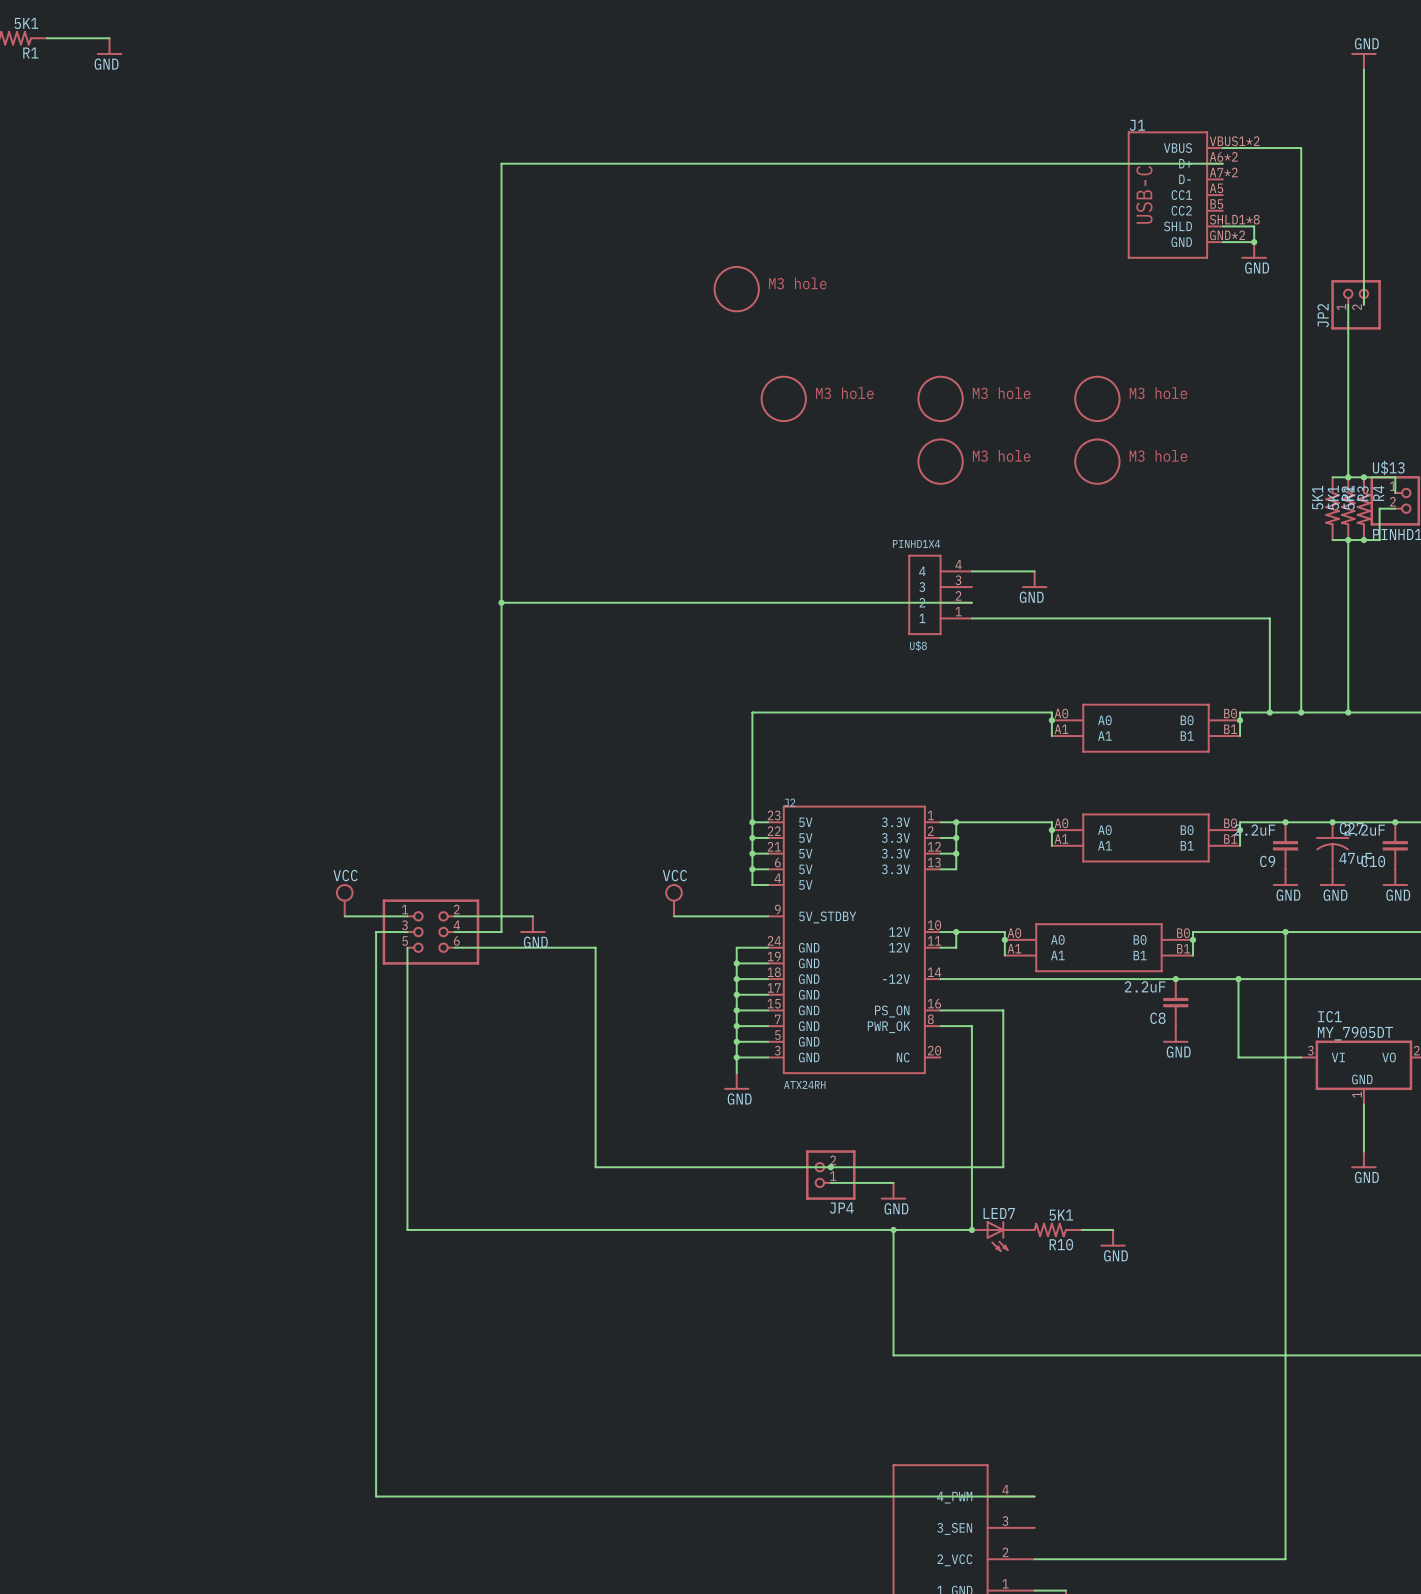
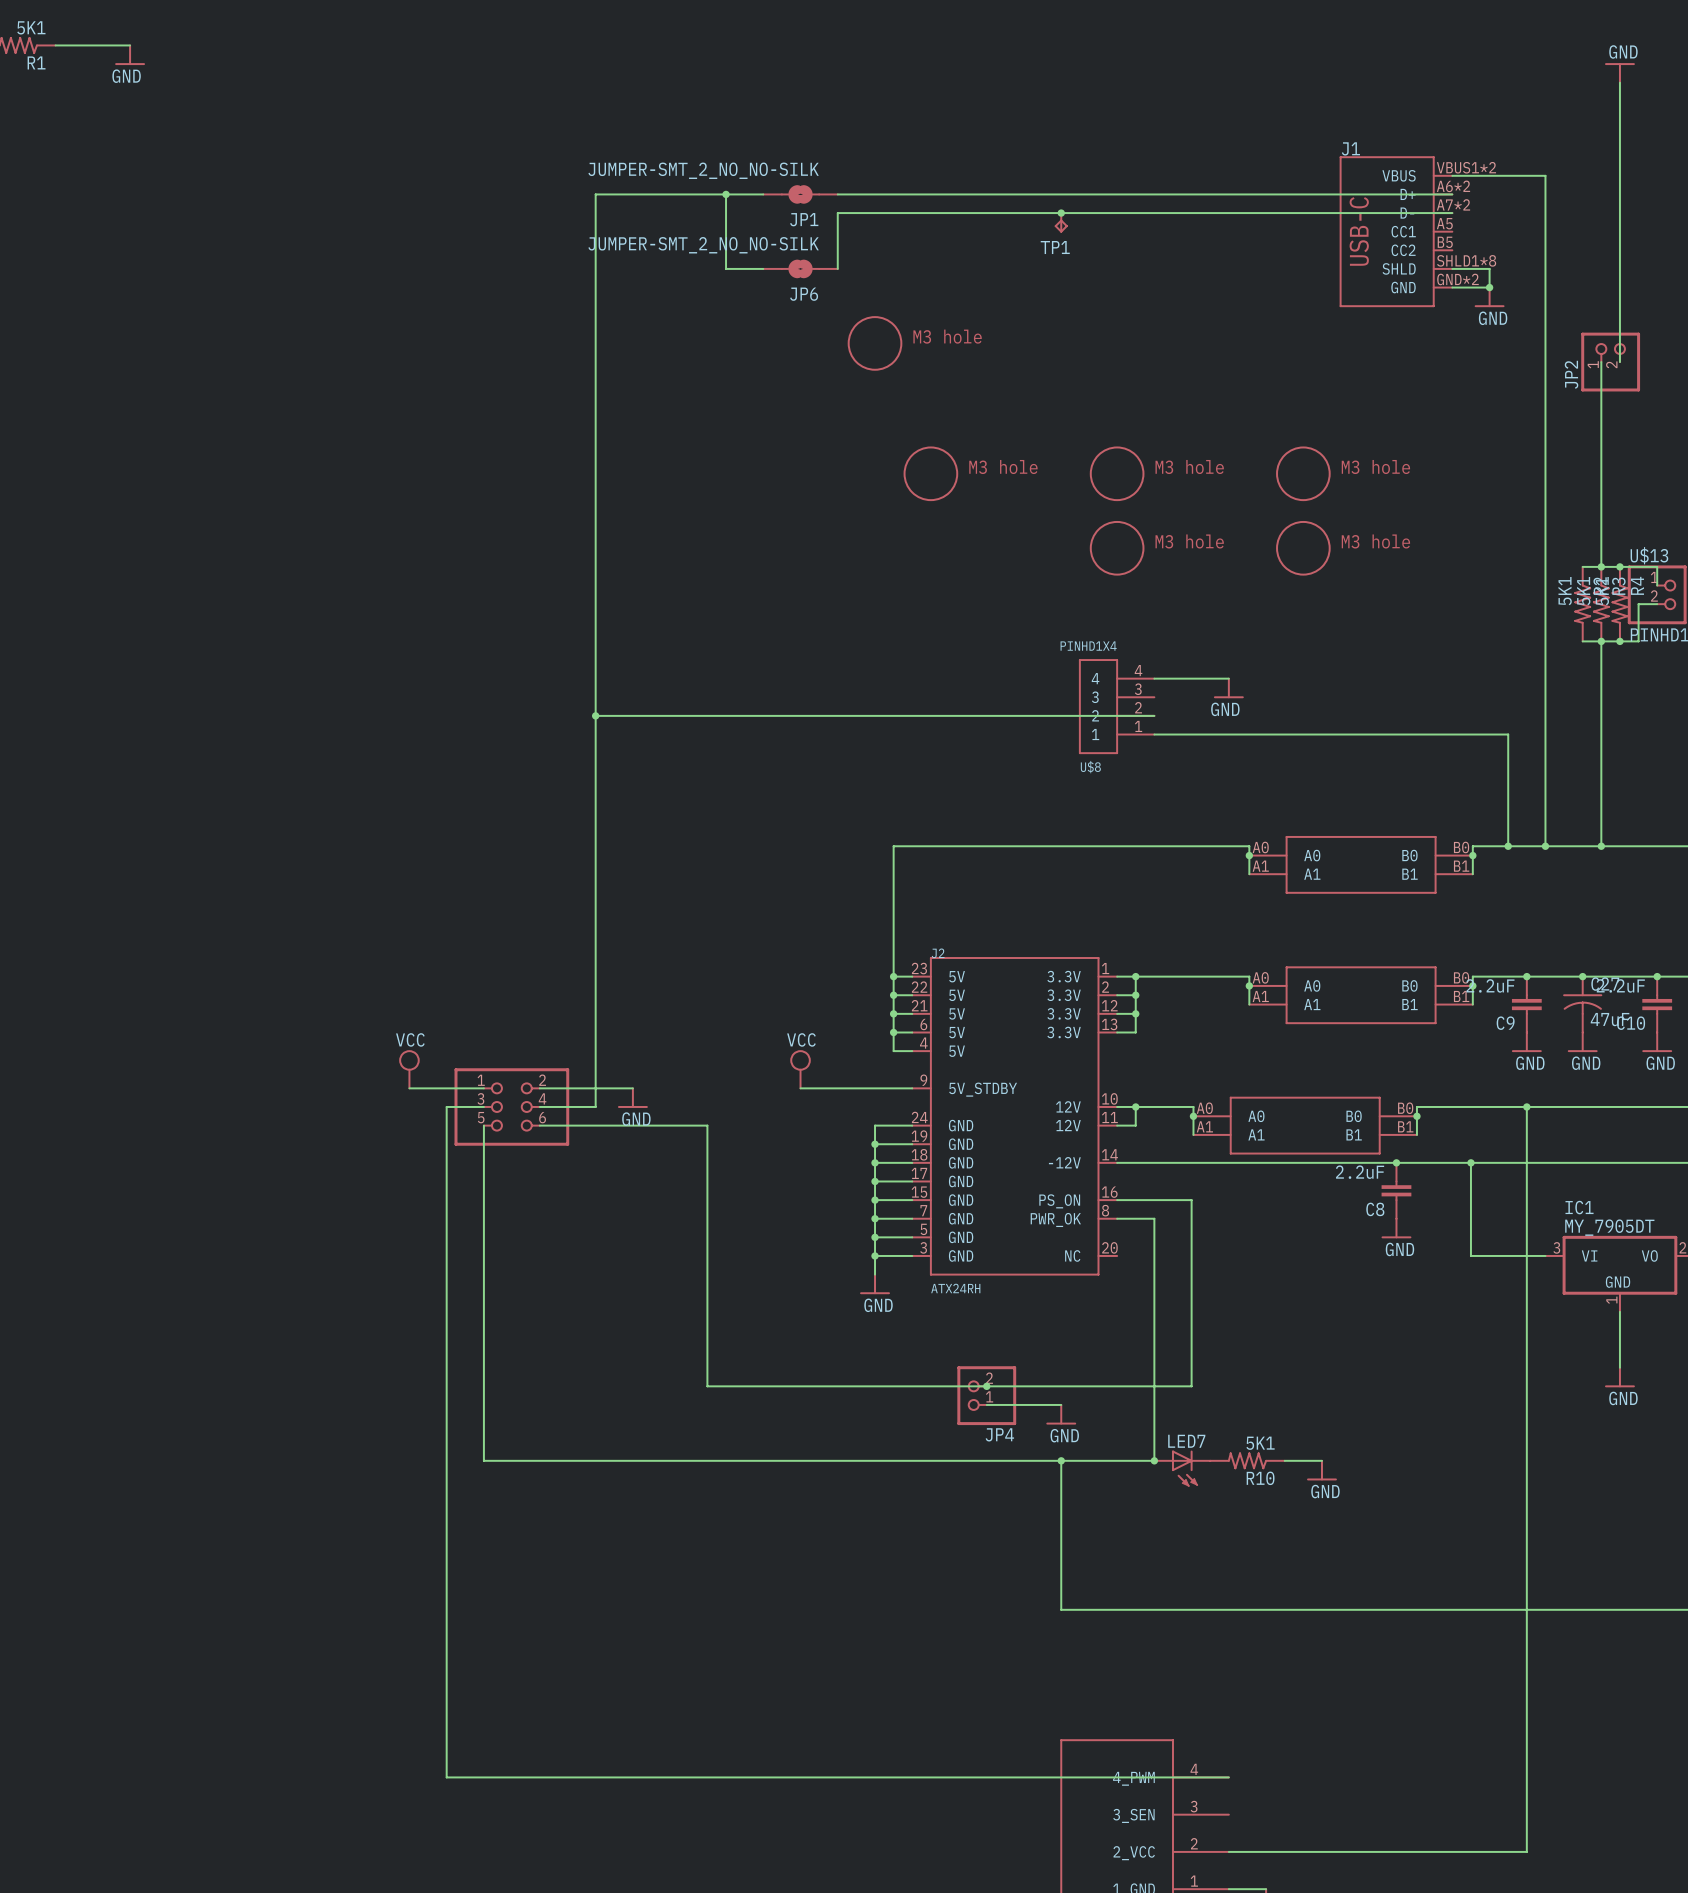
wire: none -> (726, 194) (726, 268) (763, 268)
junction: none -> (726, 194)
JP1: none -> JUMPER-SMT_2_NO_NO-SILK (800, 194)
junction: none -> (1061, 213)
wire: none -> (1452, 213) (837, 213) (837, 268)
TP1: none -> (1061, 222)
JP6: none -> JUMPER-SMT_2_NO_NO-SILK (800, 268)

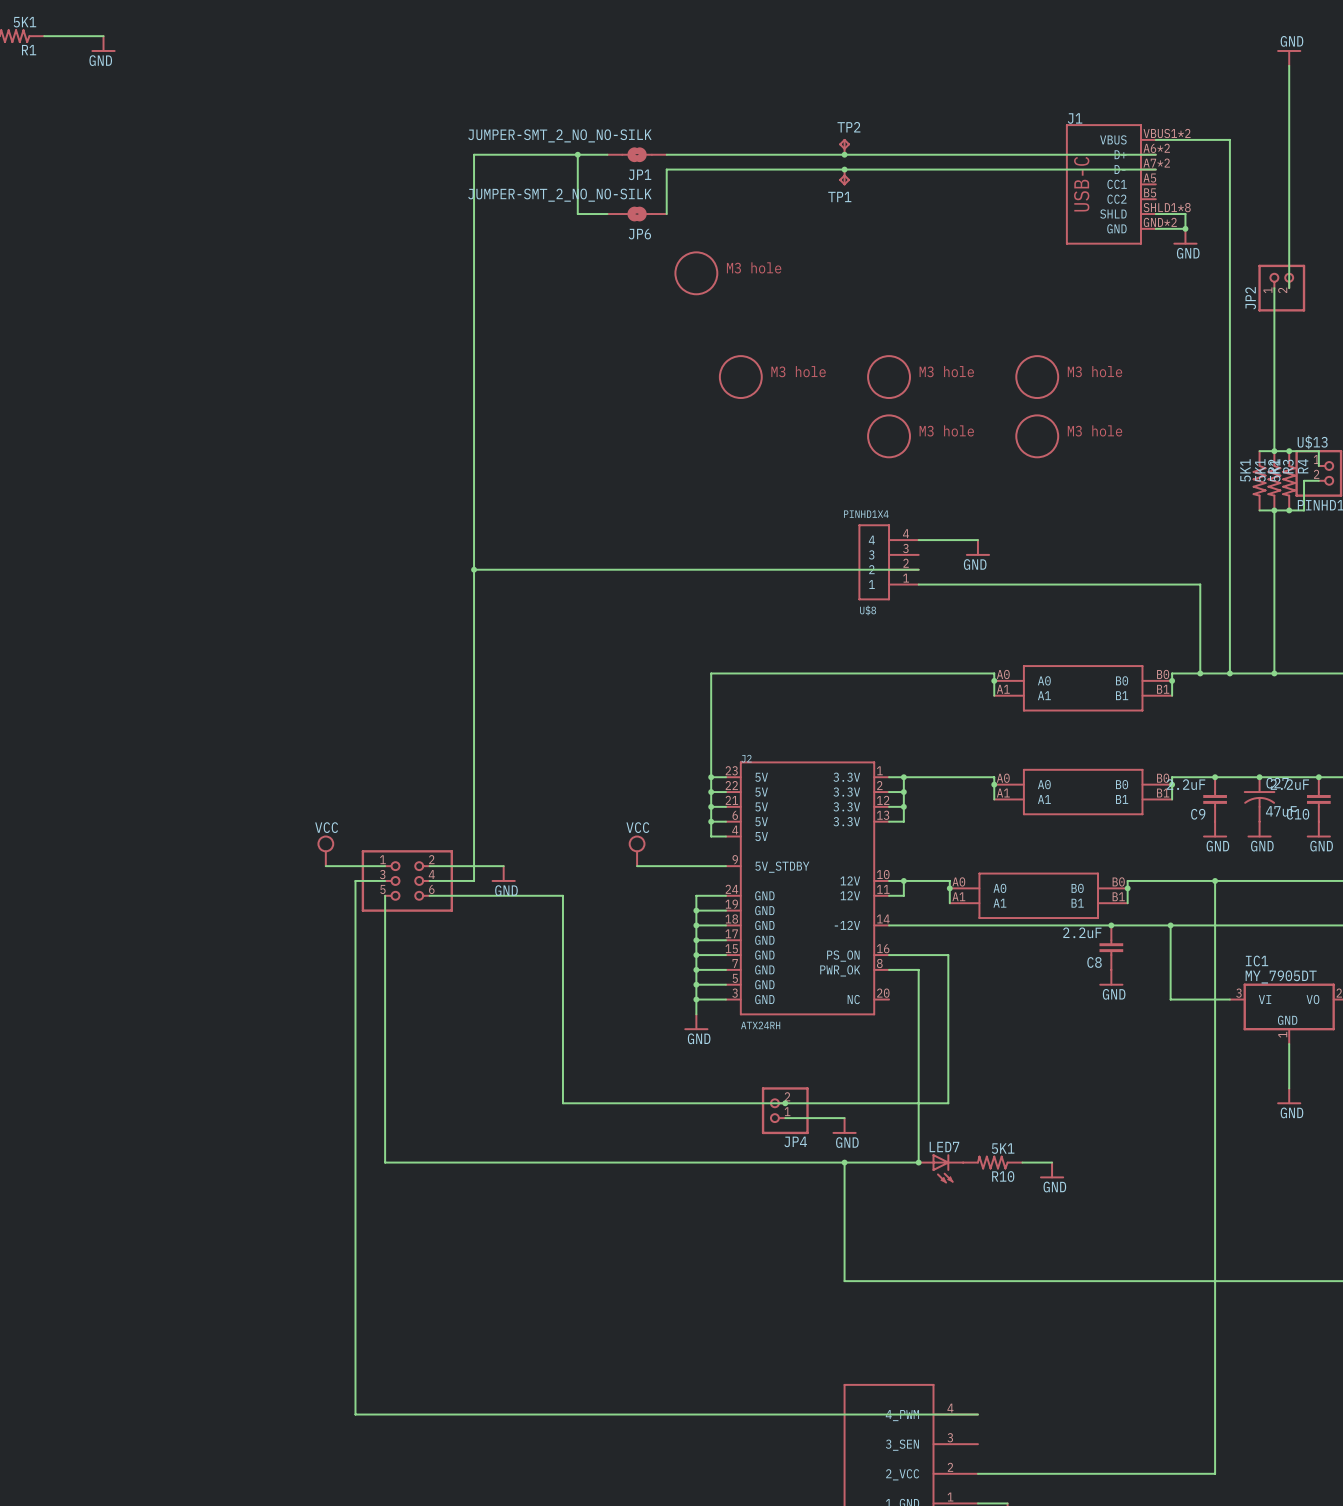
TP2: none -> (844, 146)
junction: none -> (844, 154)

